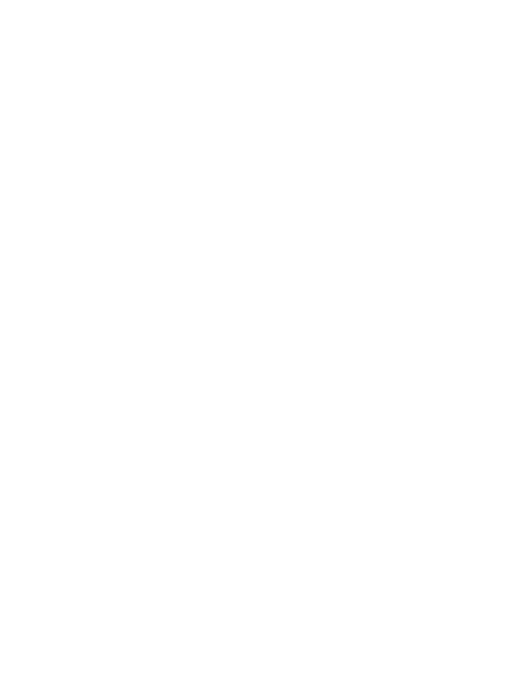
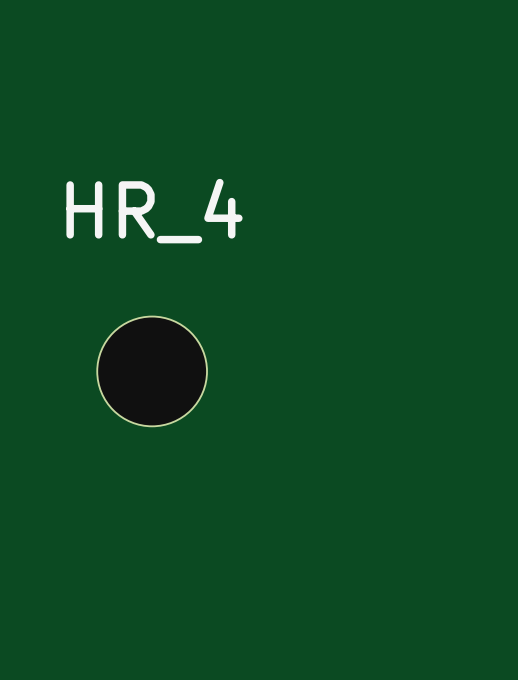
HR_4: none -> (152, 371)

